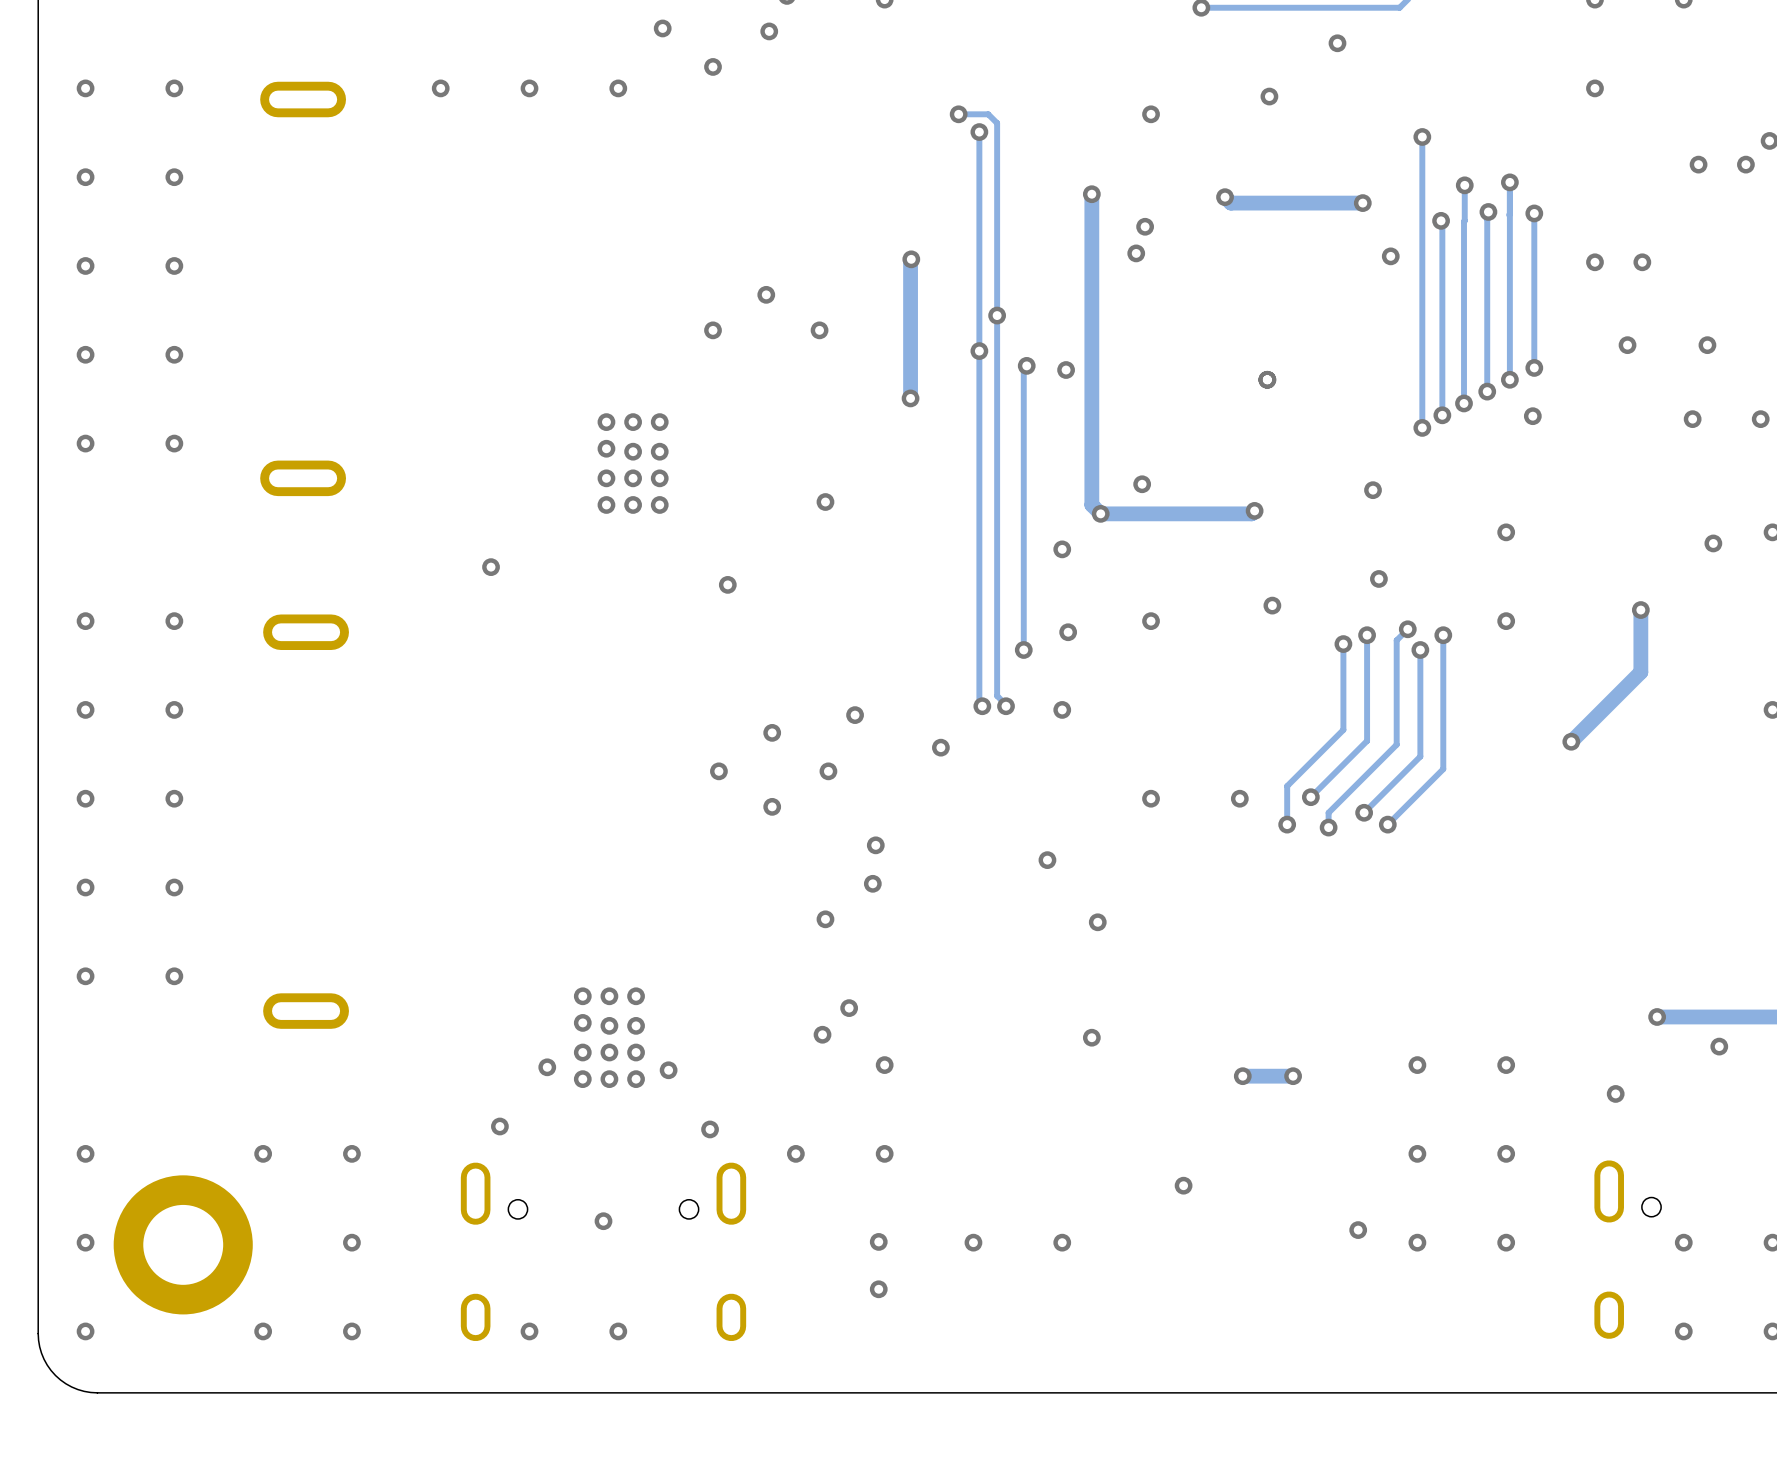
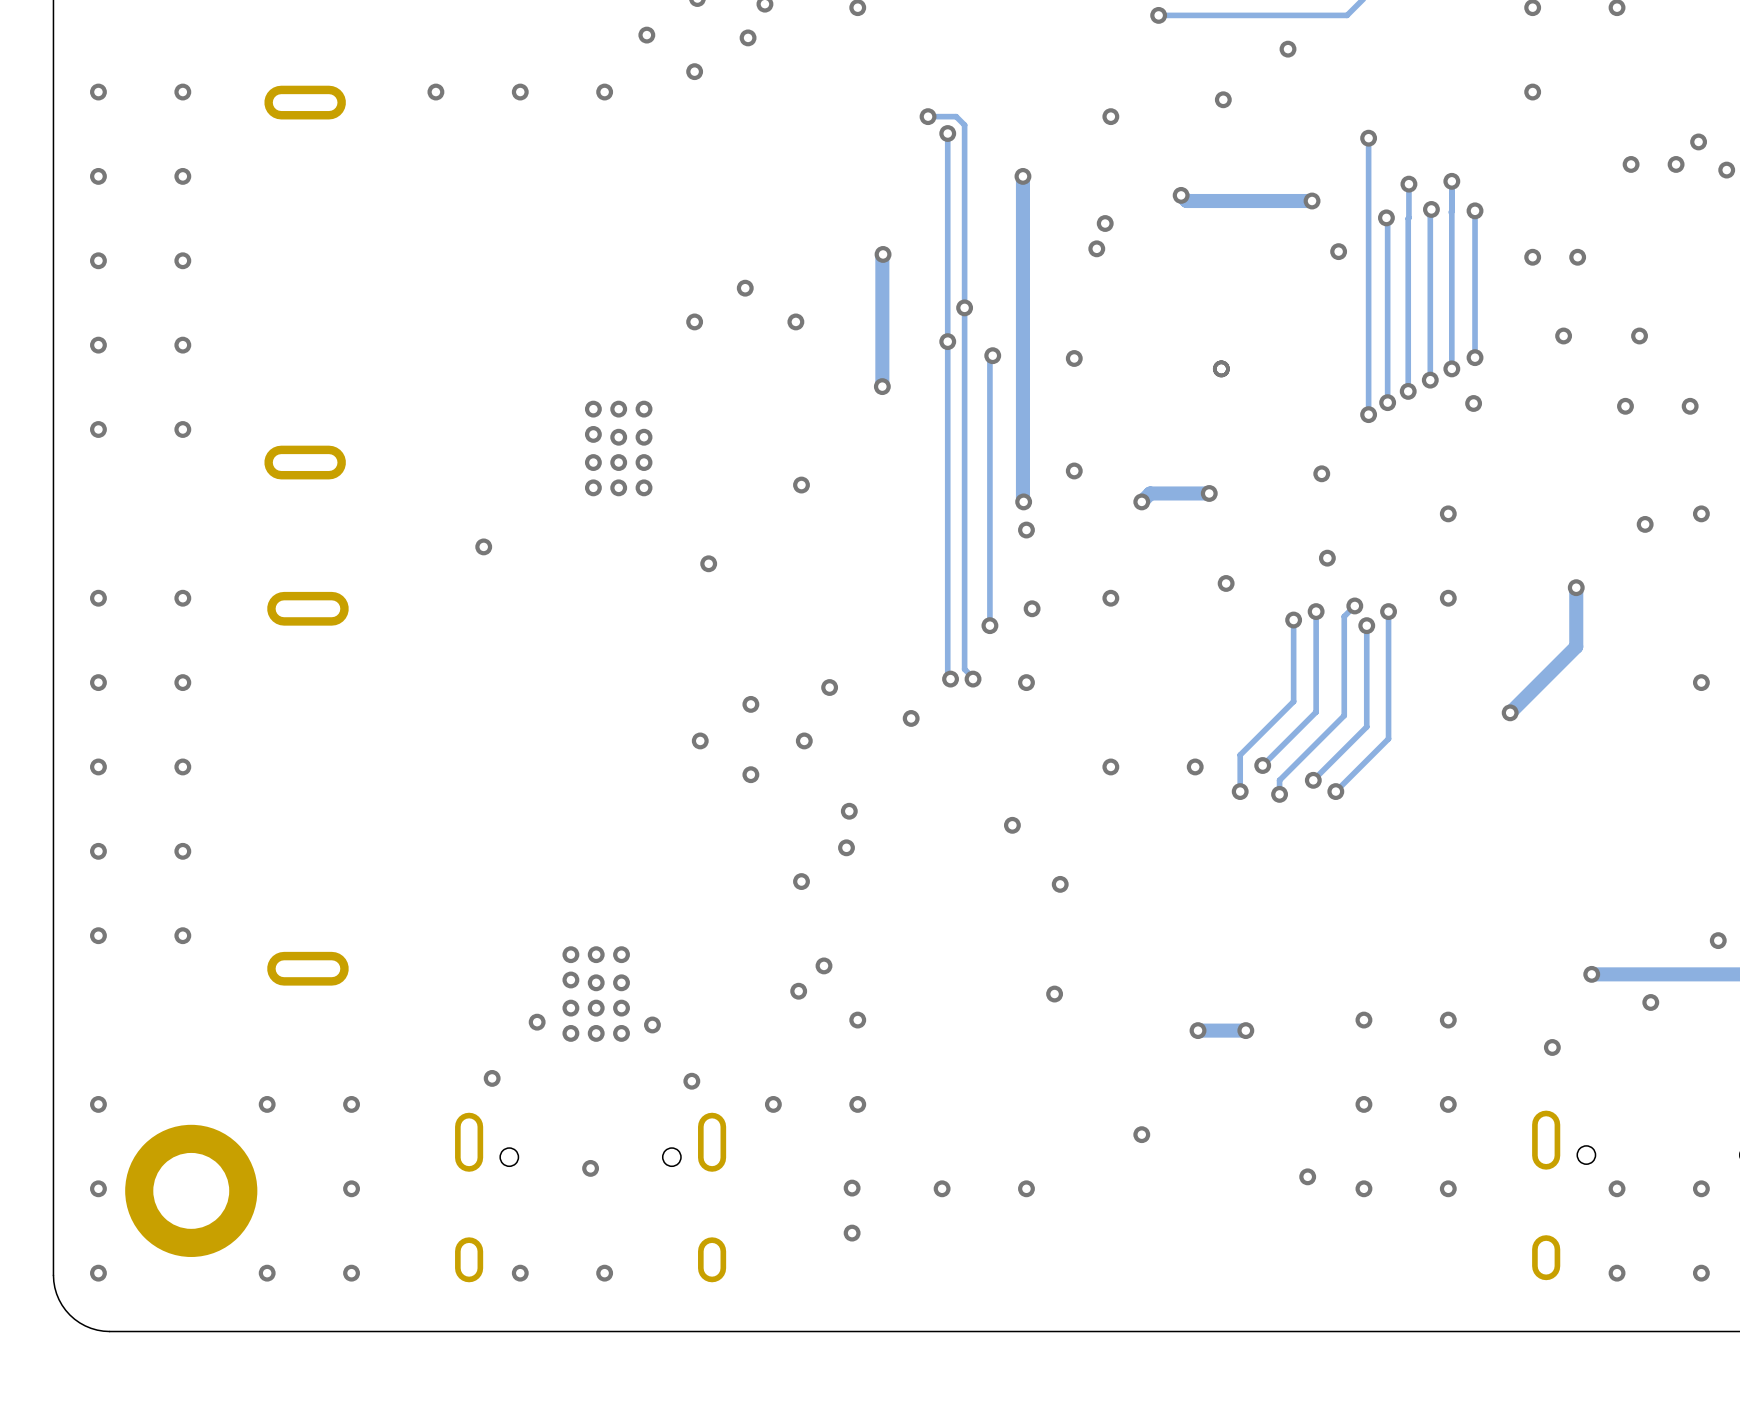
track: none -> (1022, 176) (1023, 501)
track: (1091, 194) (1091, 504) (1100, 513) (1251, 513) (1254, 510) -> (1141, 501) (1150, 493) (1209, 493)
via position: (1091, 194) -> (1022, 176)
via position: (1066, 370) -> (1074, 358)
via: (1142, 484) -> none
via: none -> (1074, 470)
via: (1100, 513) -> none
via: none -> (1023, 501)
via: none -> (1141, 501)

